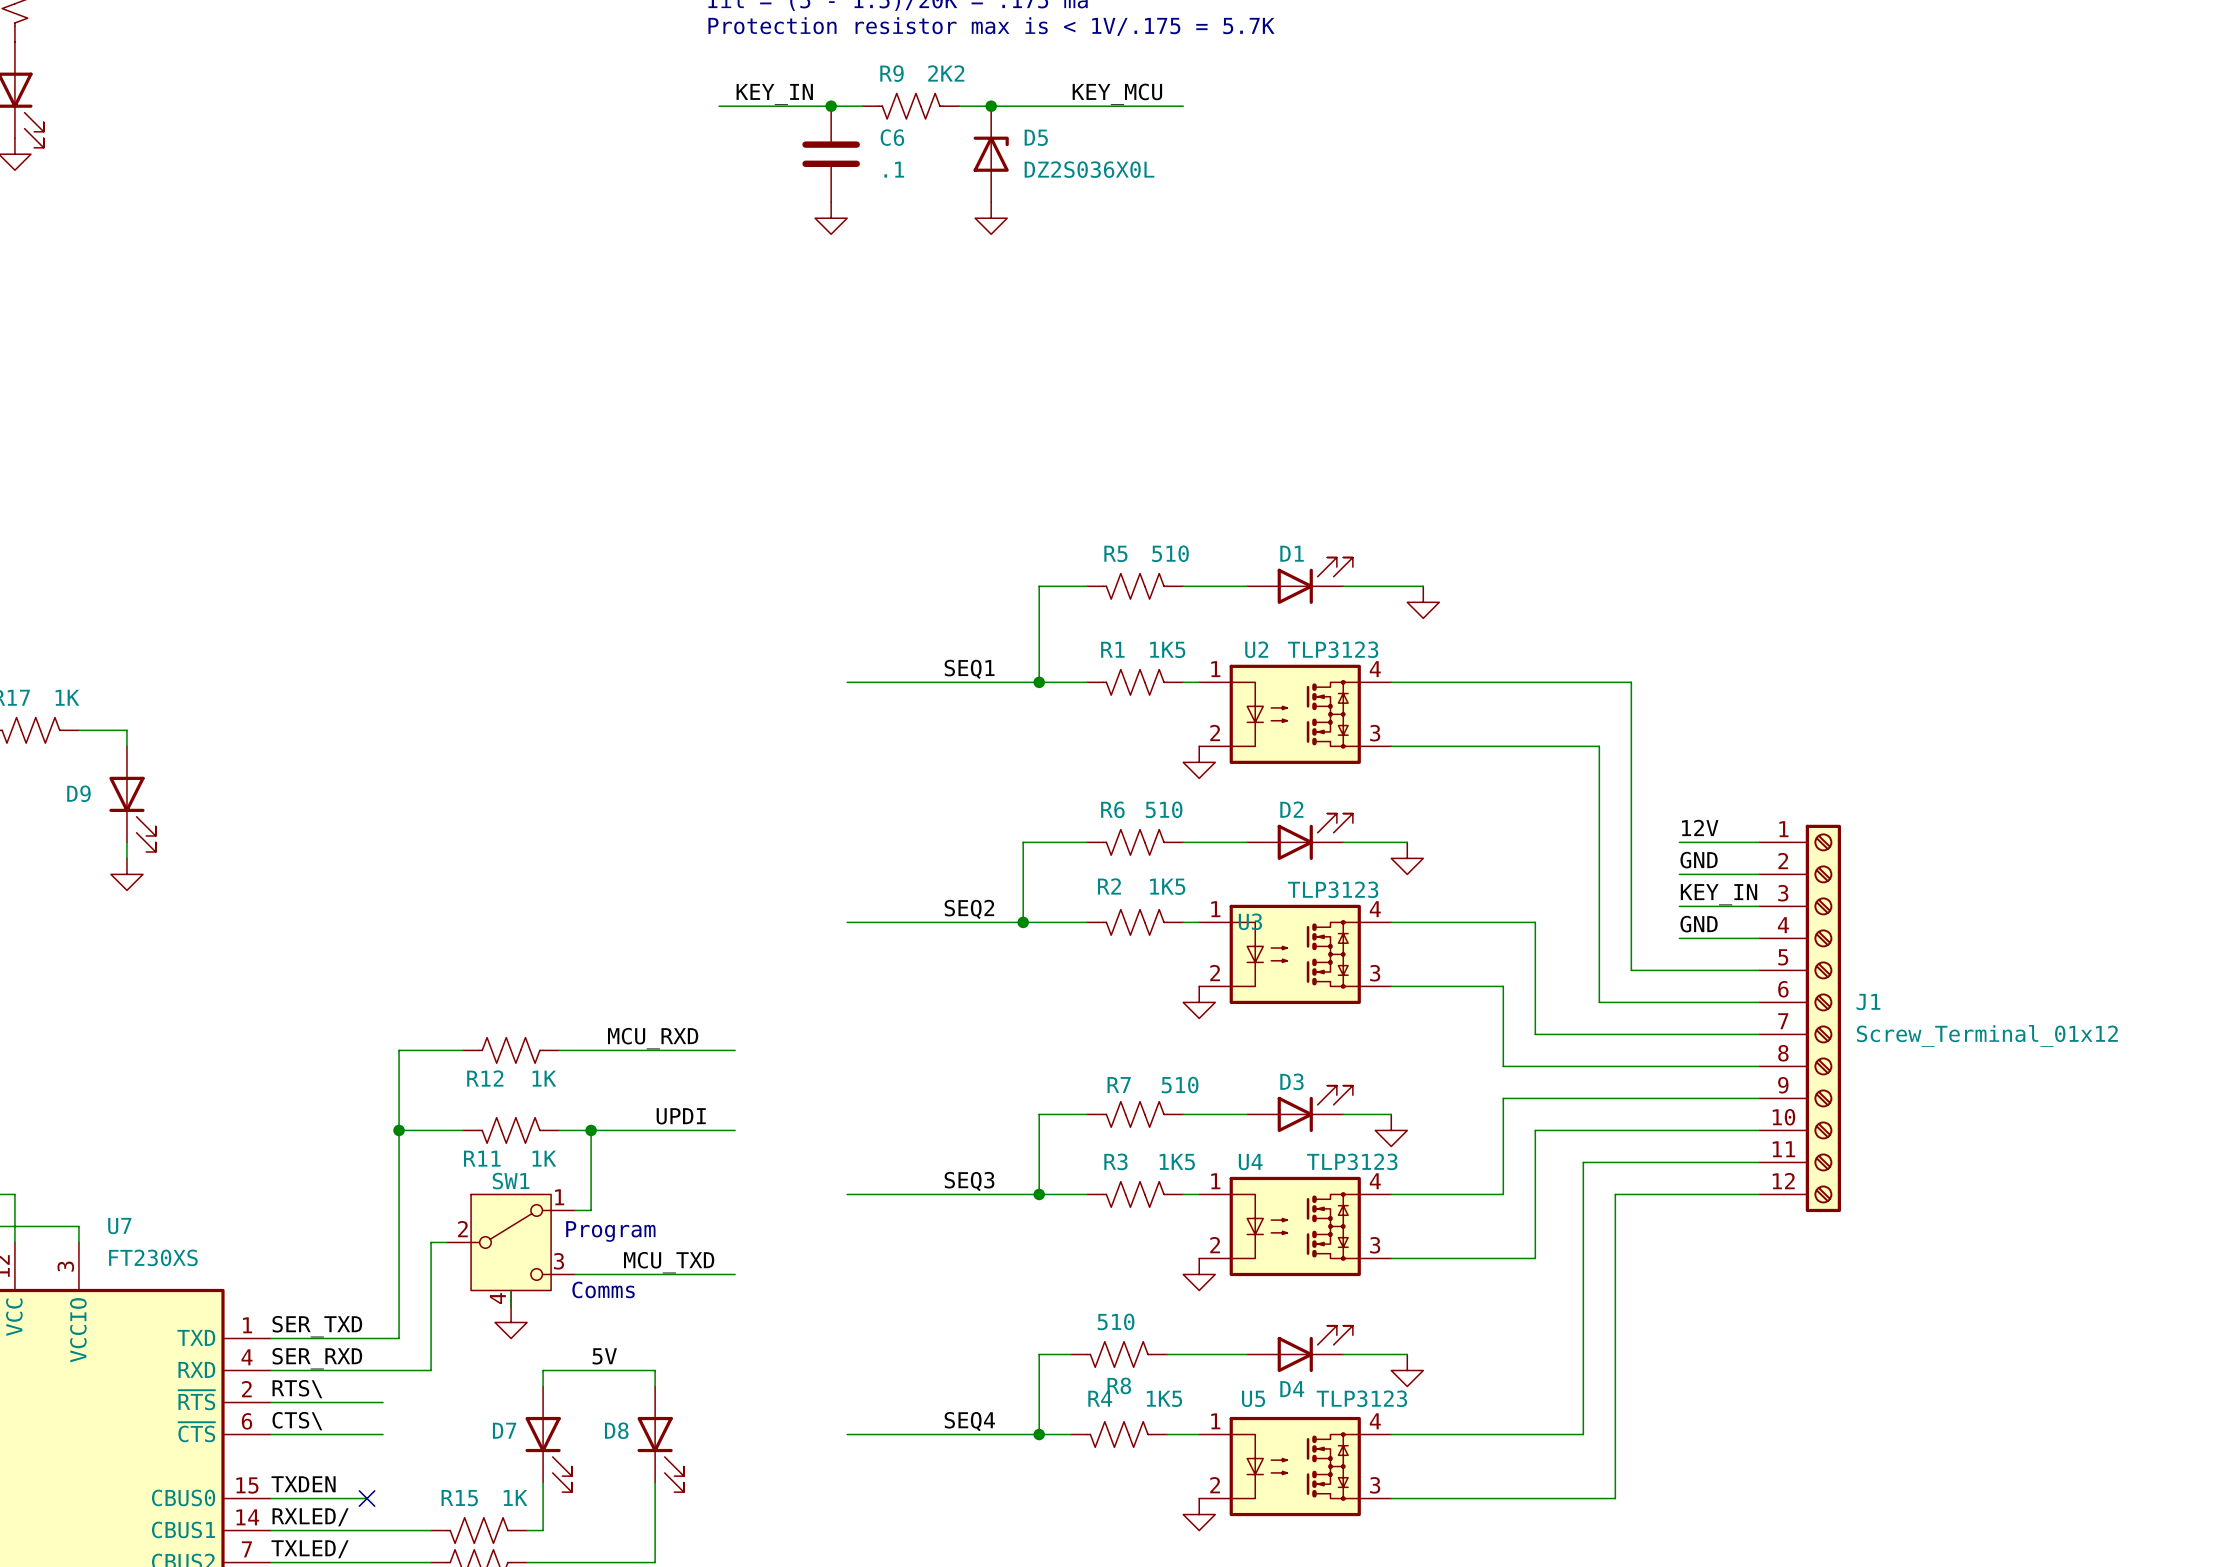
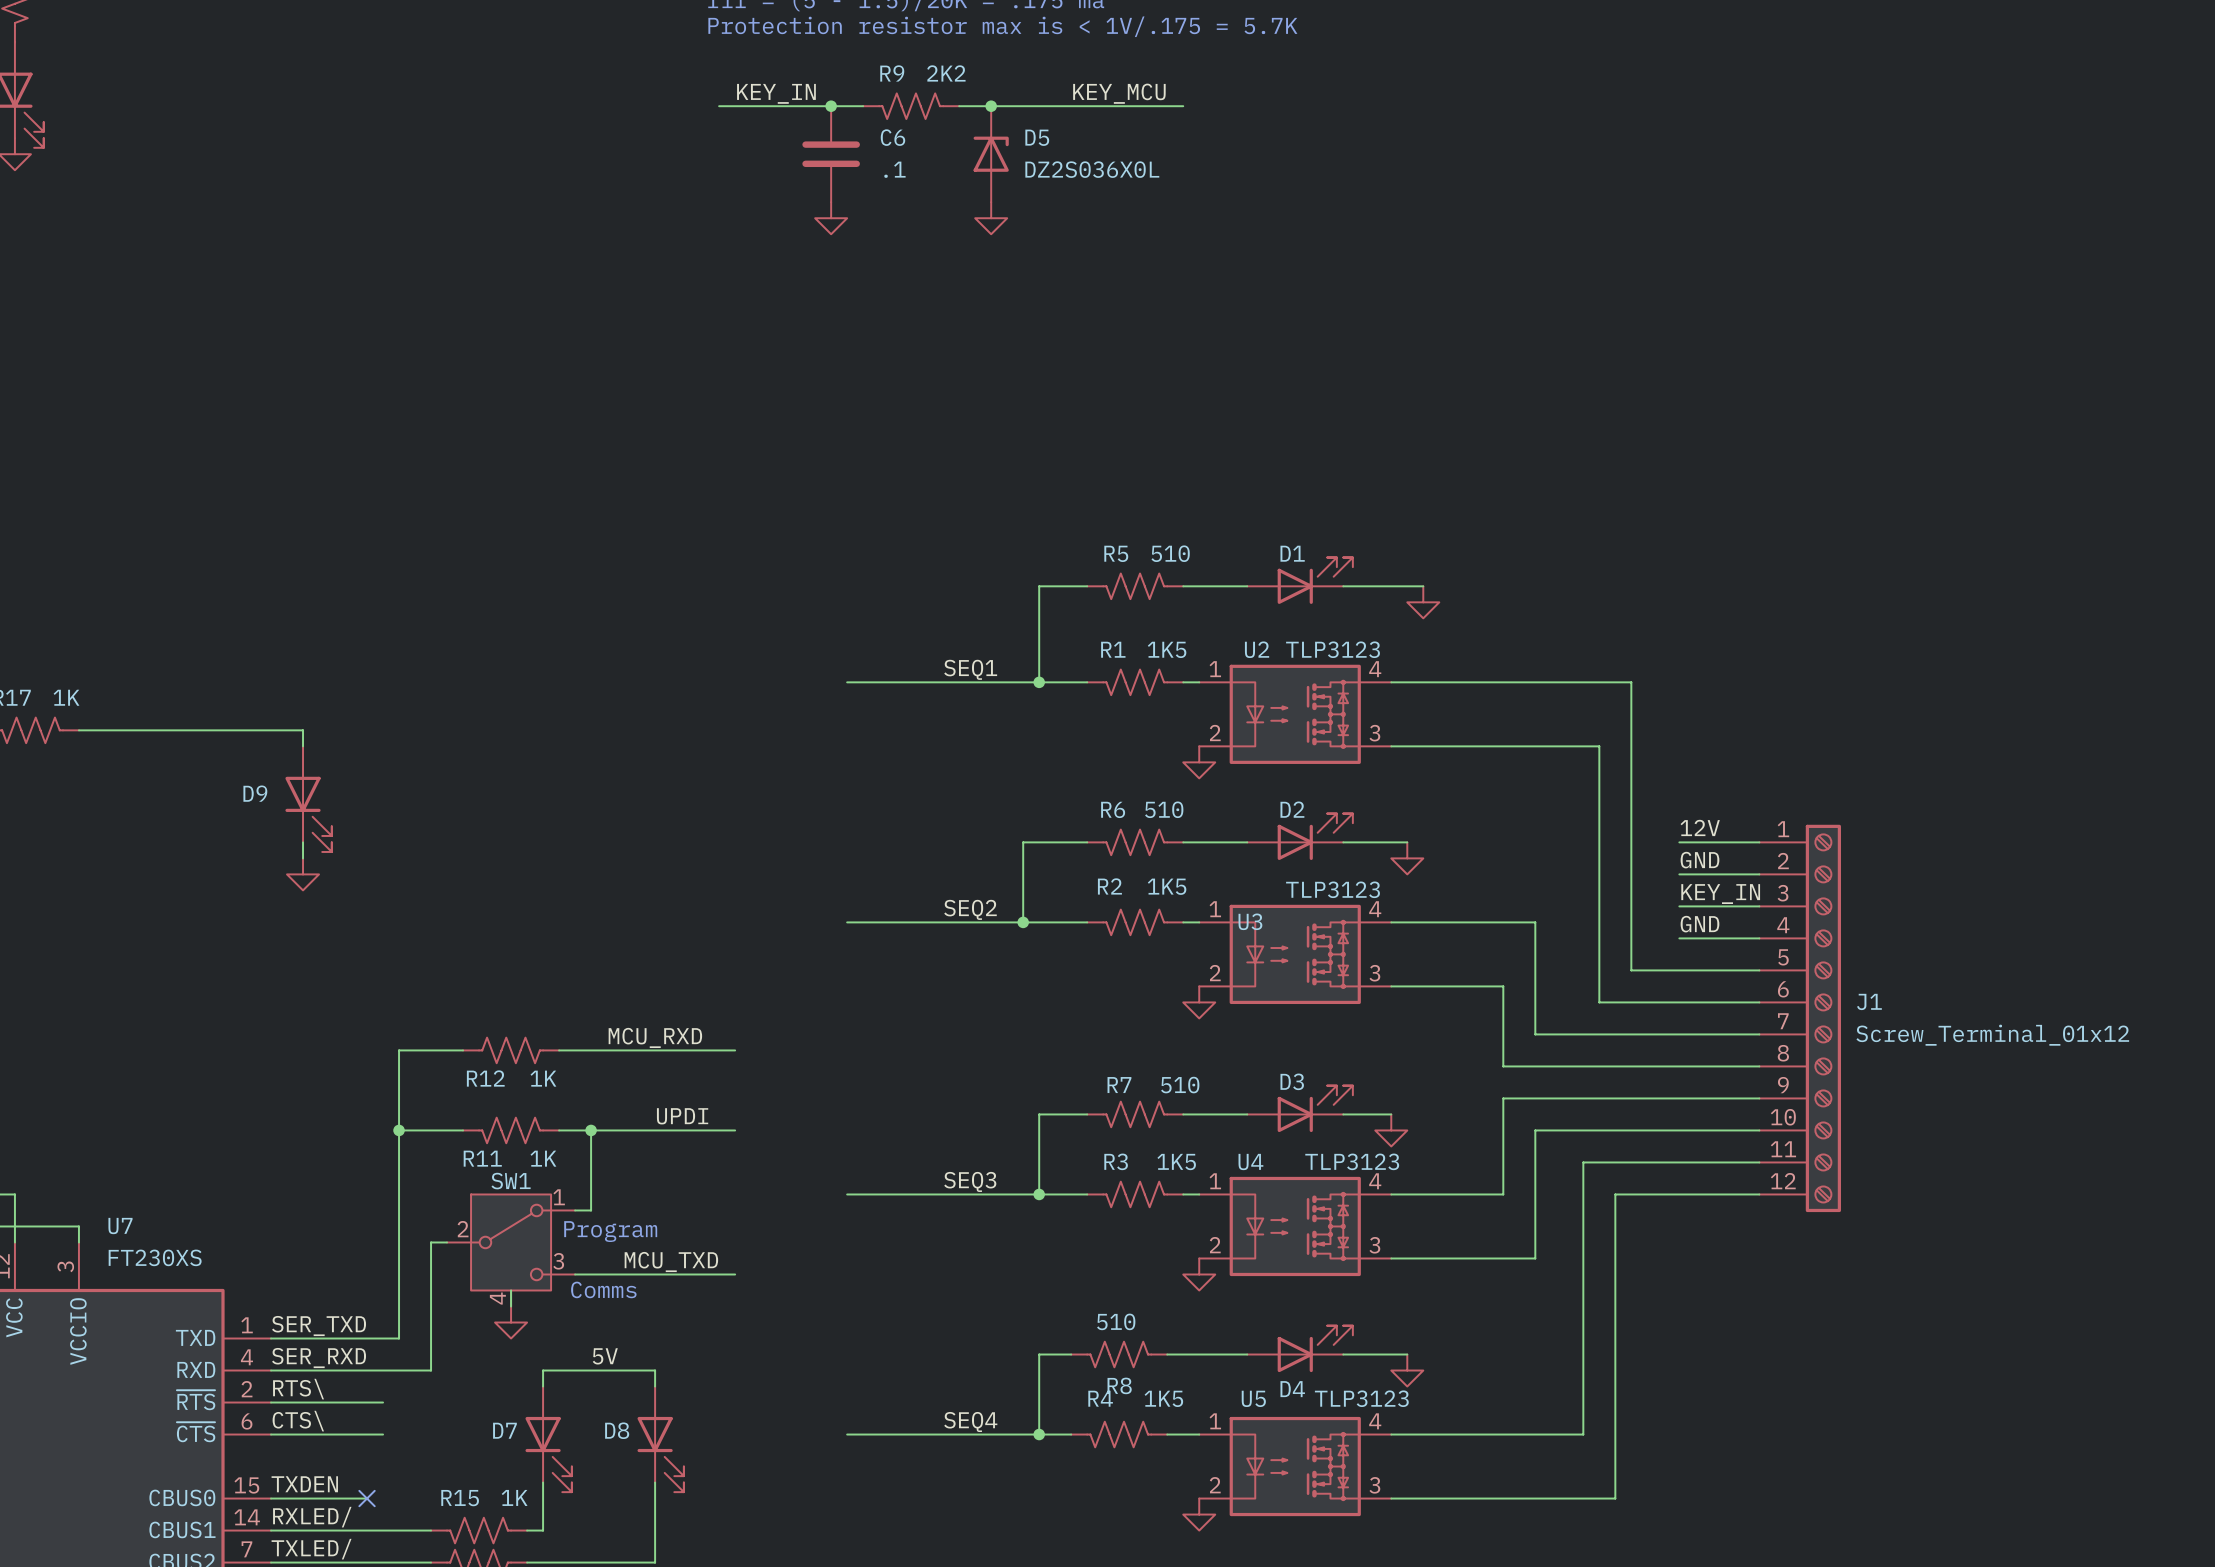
wire: (126, 730) (126, 746) -> (126, 730) (303, 730) (303, 746)
D9 position: (132, 799) -> (308, 799)
wire: (126, 842) (126, 858) -> (303, 842) (303, 858)
power symbol position: (126, 874) -> (303, 874)

